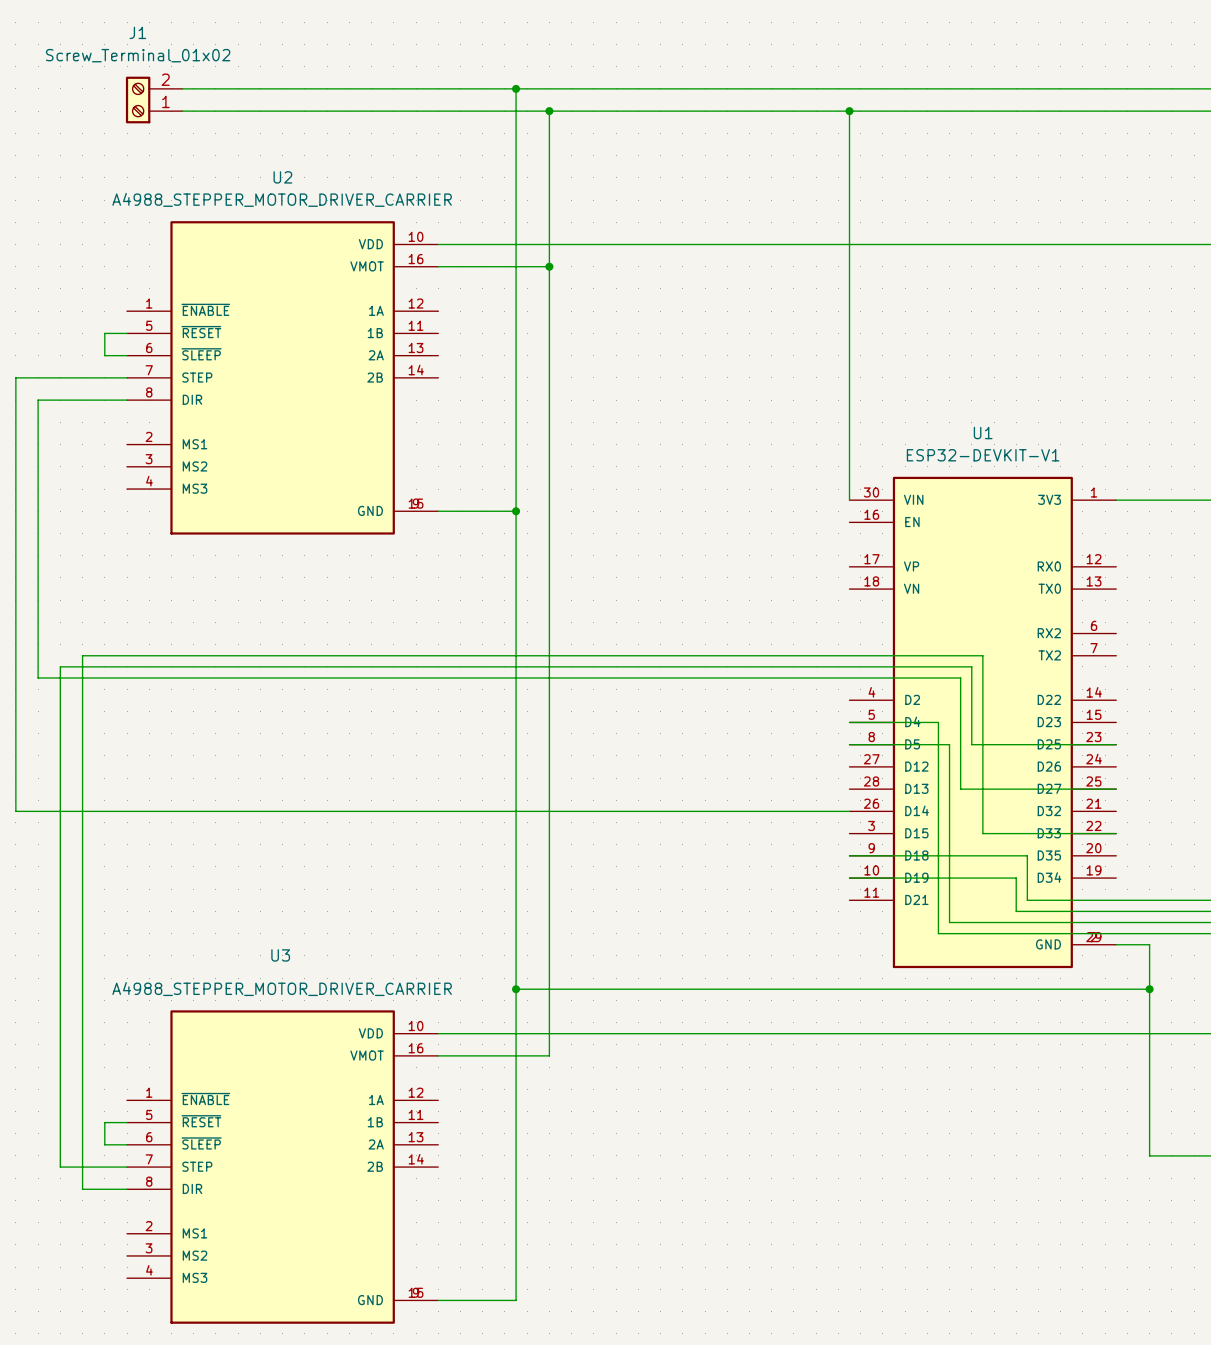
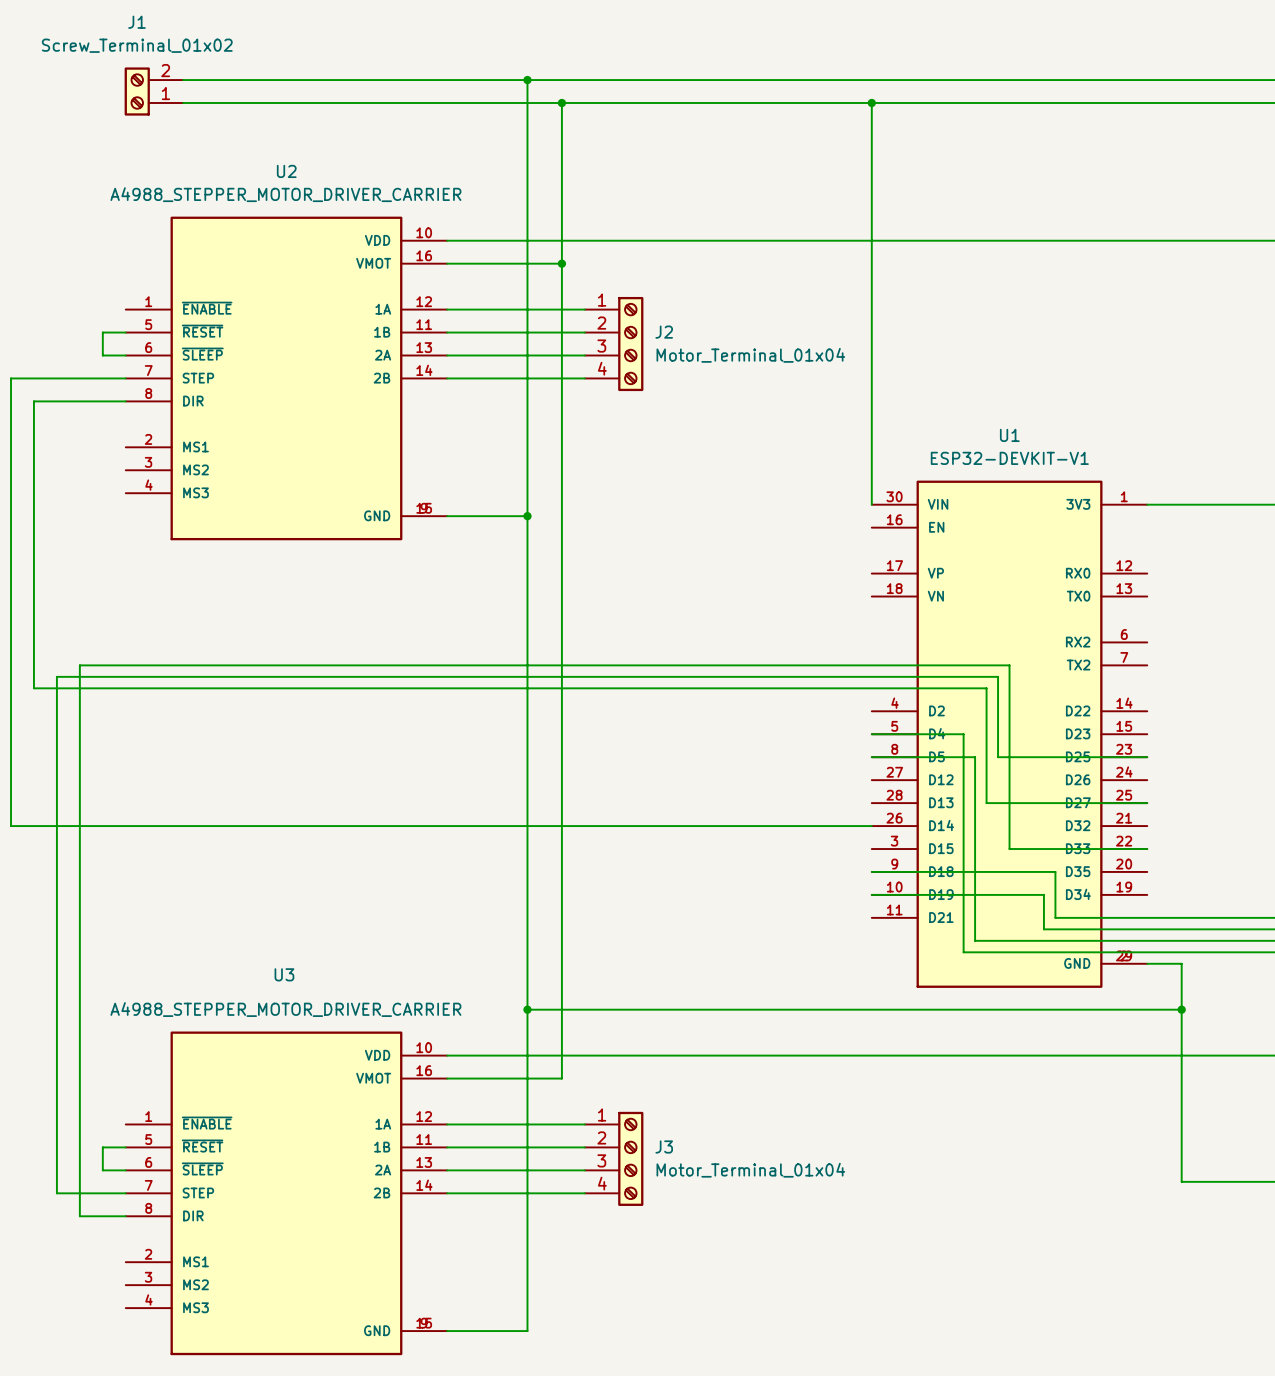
wire: none -> (447, 309) (584, 309)
wire: none -> (447, 332) (584, 332)
J2: none -> Motor_Terminal_01x04 (614, 344)
wire: none -> (447, 355) (584, 355)
wire: none -> (447, 378) (584, 378)
wire: none -> (447, 1124) (584, 1124)
wire: none -> (447, 1147) (584, 1147)
J3: none -> Motor_Terminal_01x04 (614, 1158)
wire: none -> (447, 1170) (584, 1170)
wire: none -> (447, 1193) (584, 1193)

